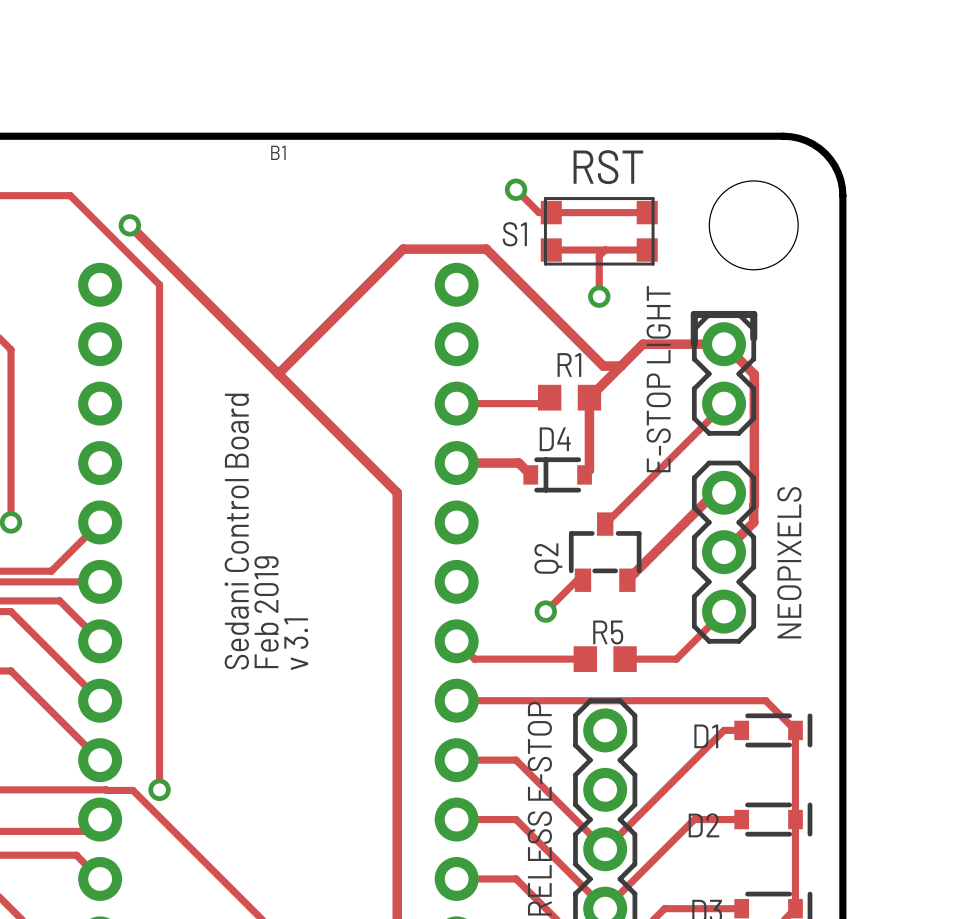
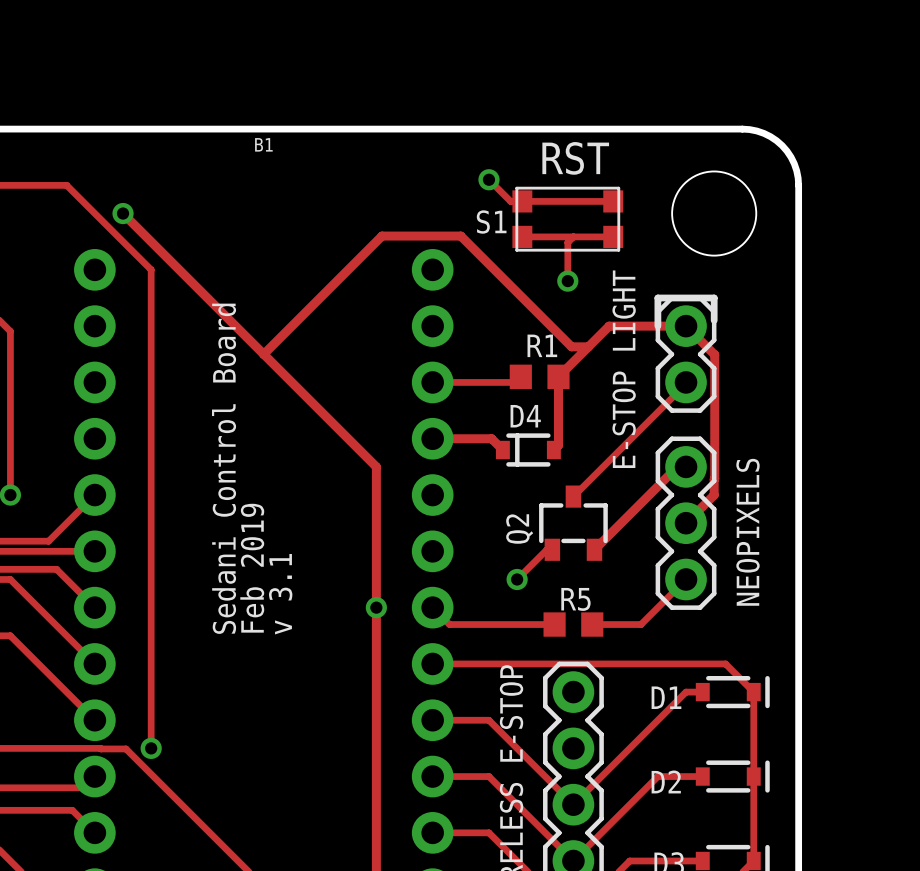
via: none -> (376, 607)

